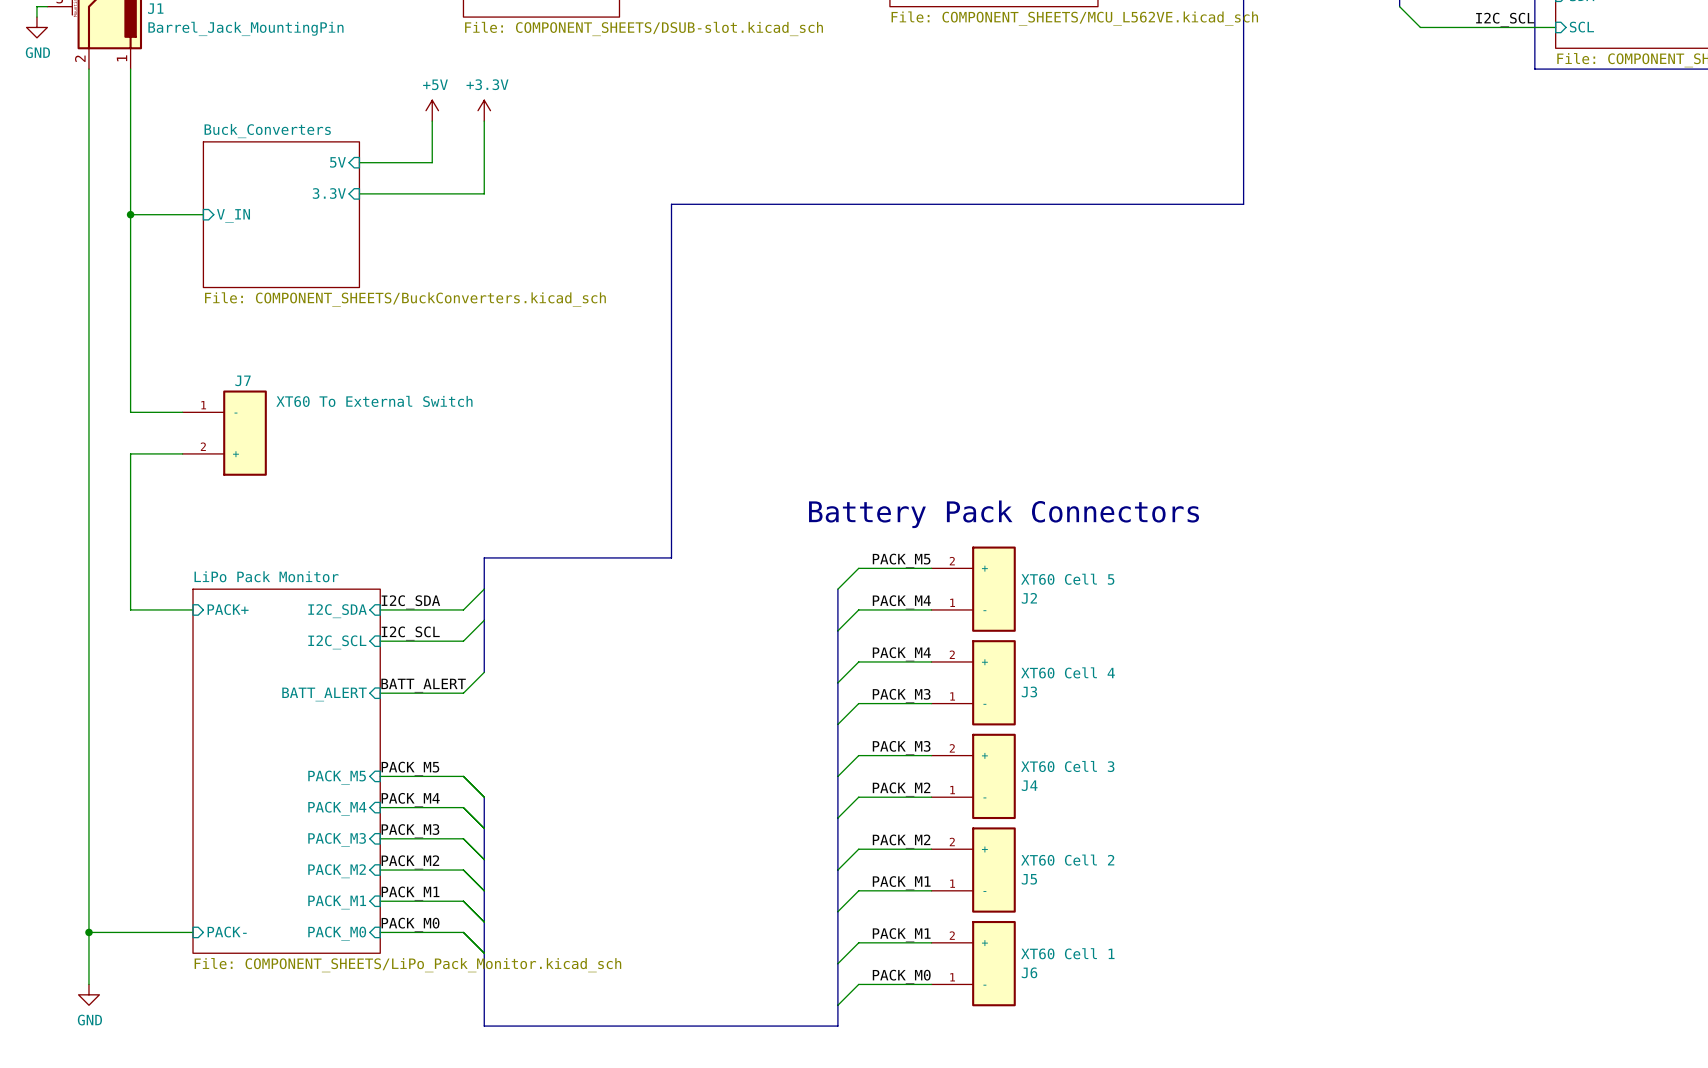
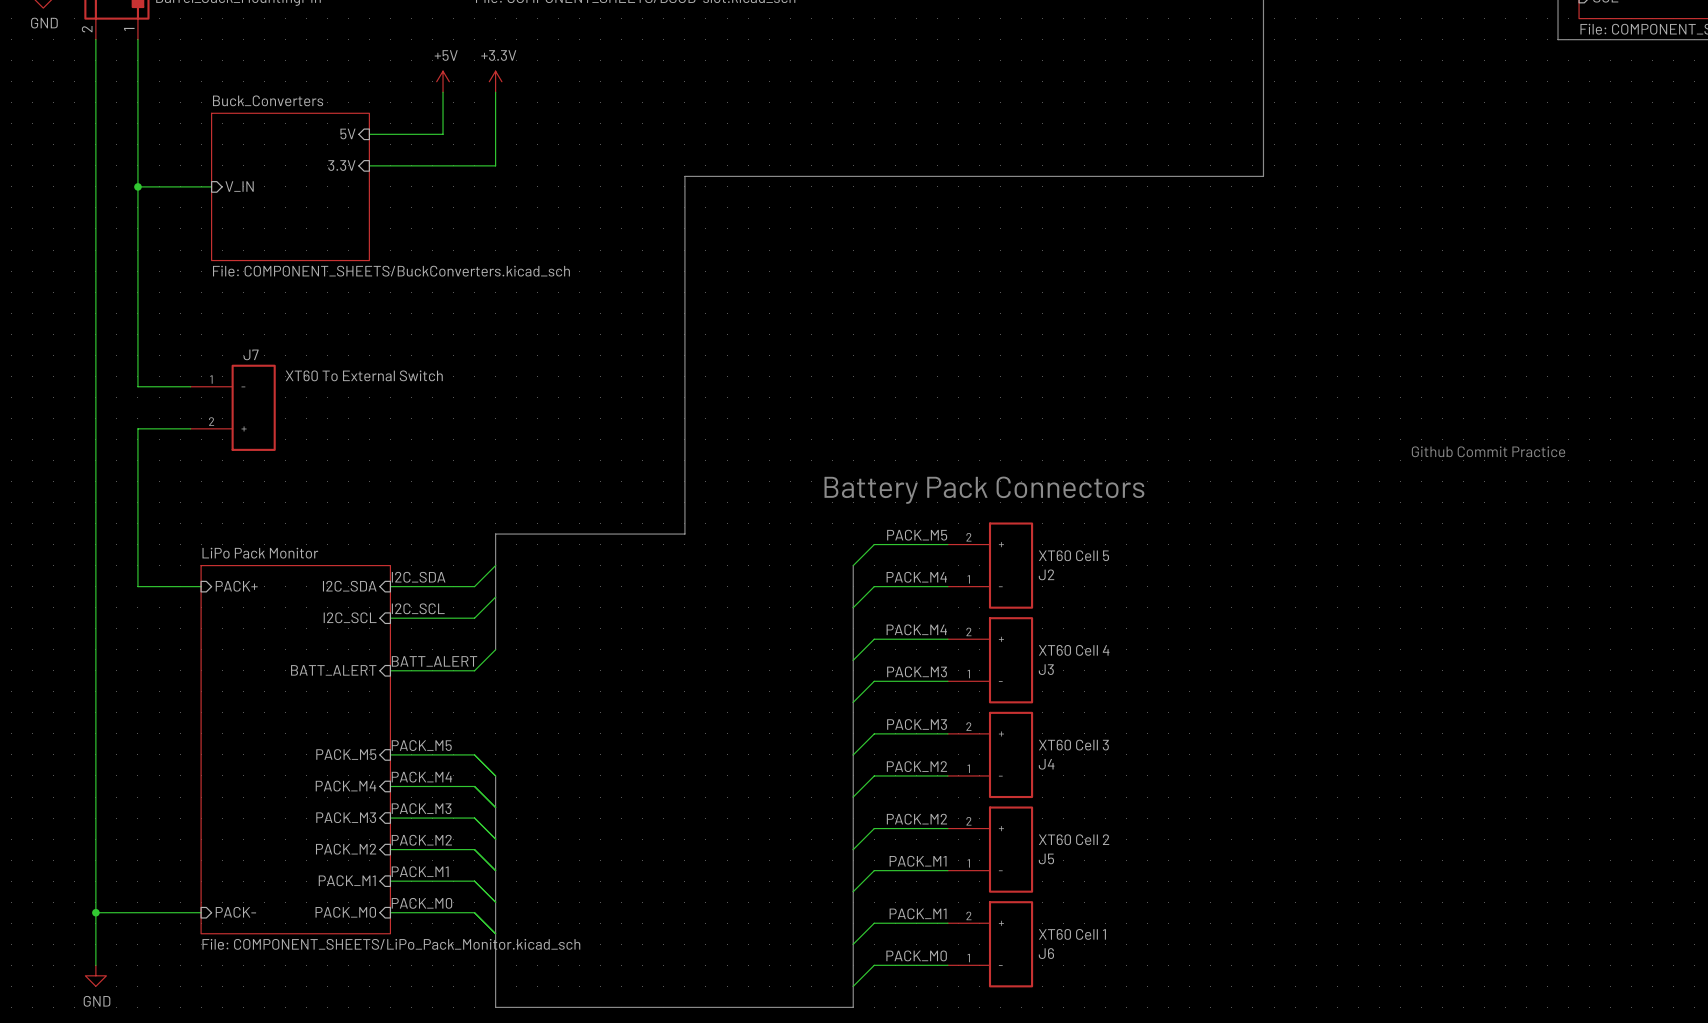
text: none -> Github Commit Practice (1488, 451)

